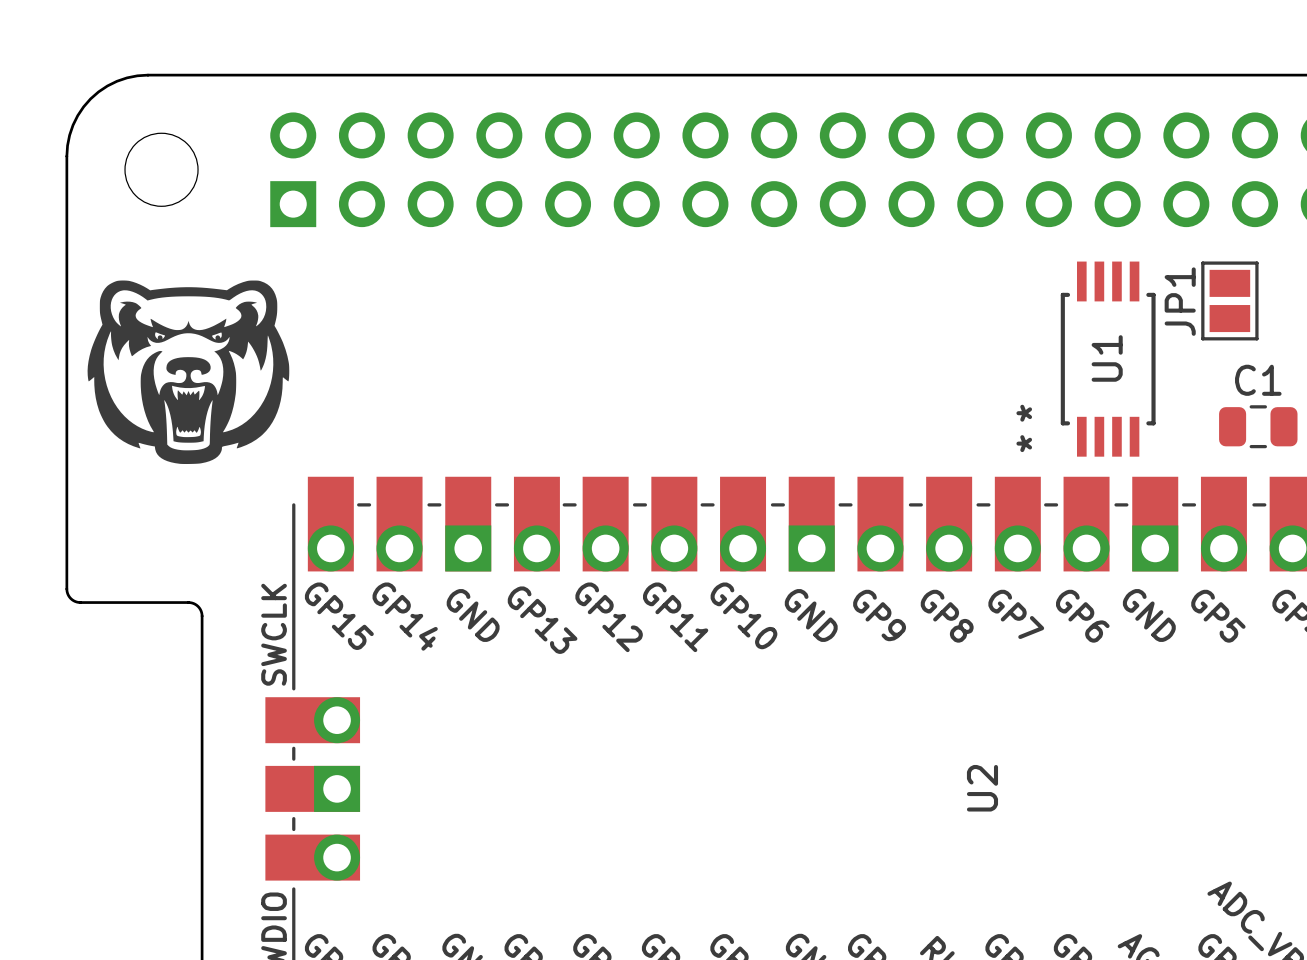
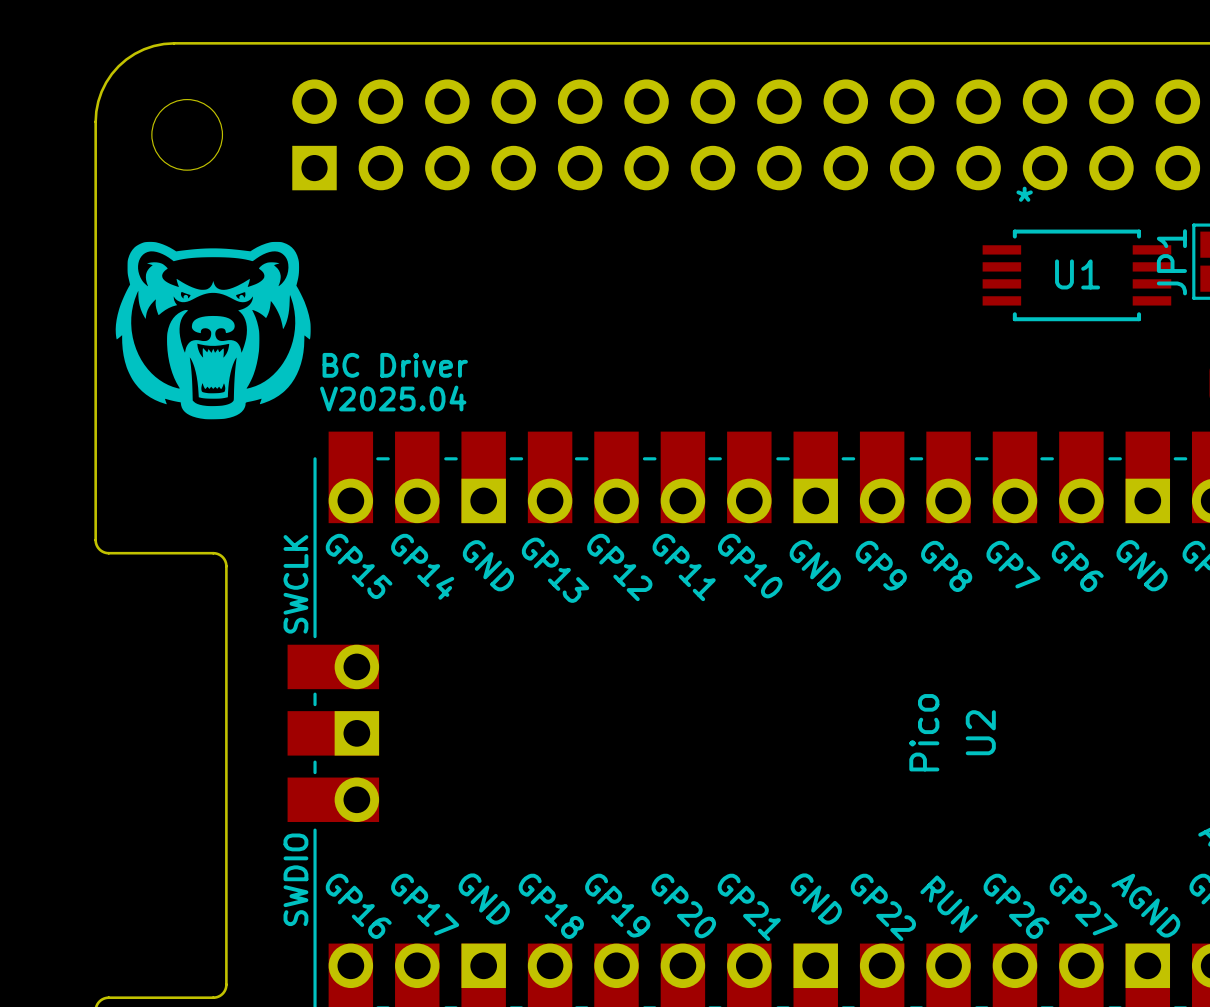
U1 footprint: [1060, 261, 1156, 457] -> [982, 229, 1172, 322]
text: none -> BC Driver (395, 365)
text: none -> V2025.04 (393, 398)
U2 value: none -> Pico (924, 732)

